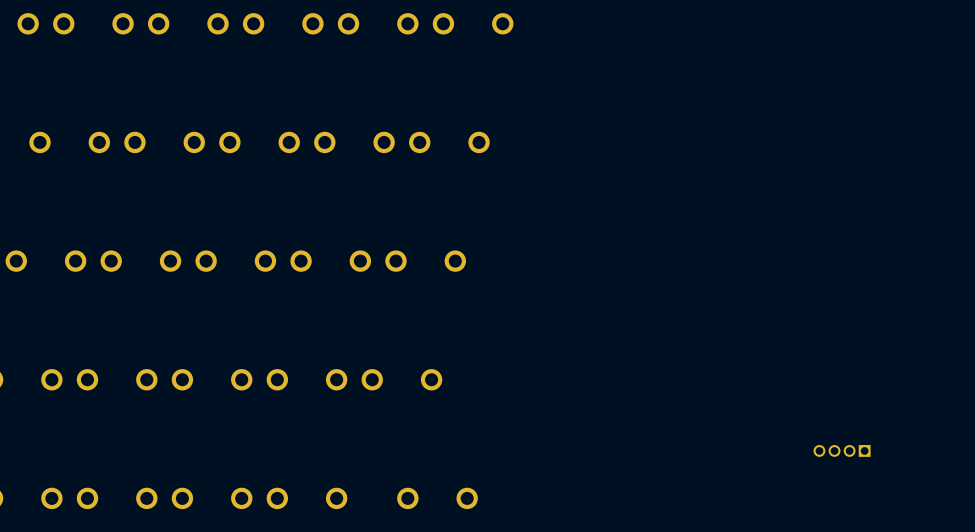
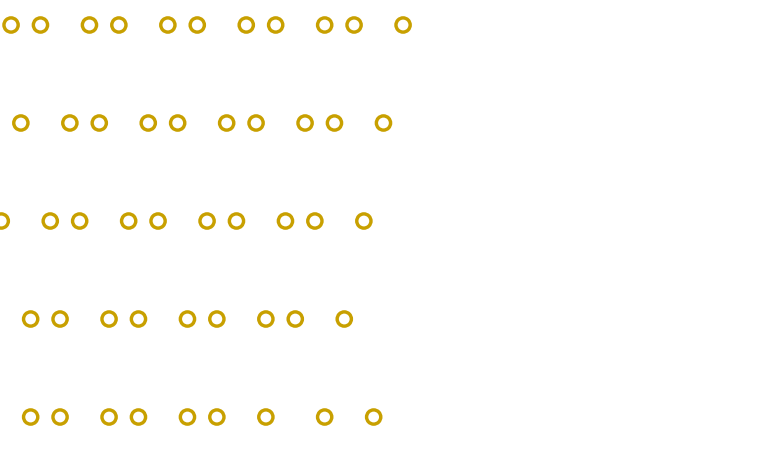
part: (842, 450) -> none

